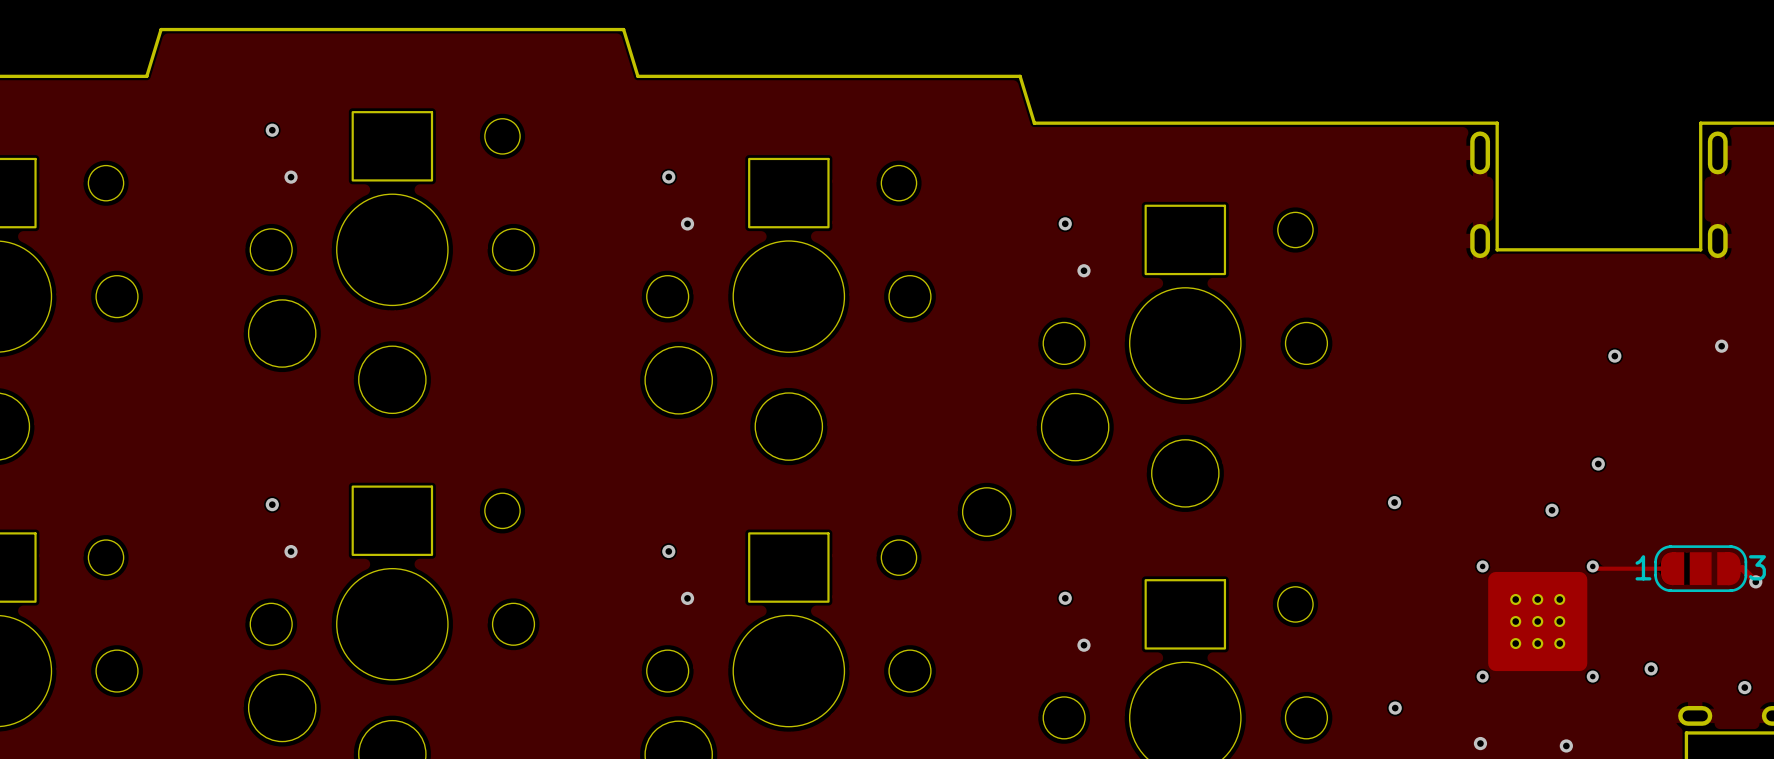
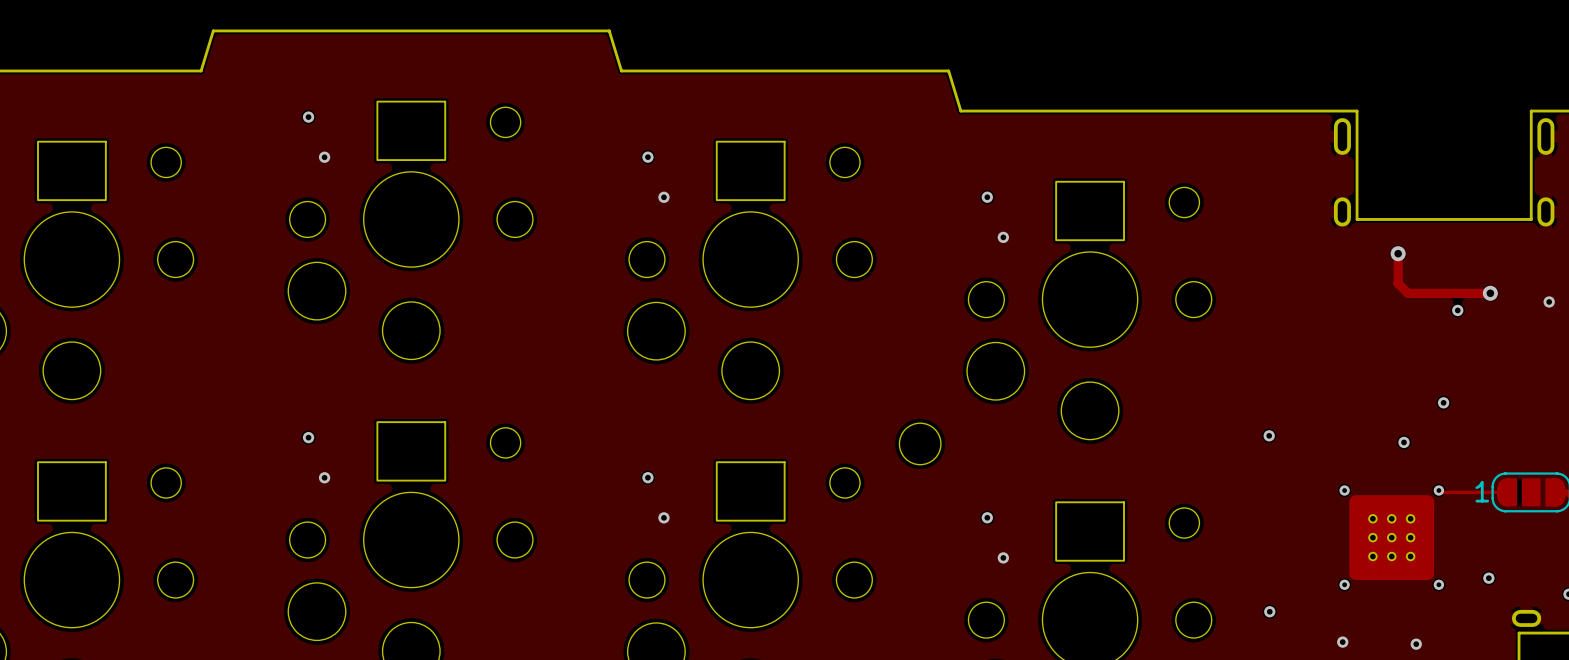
track: none -> (1398, 253) (1398, 283) (1407, 293) (1490, 293)
via: none -> (1398, 253)
via: none -> (1490, 293)

